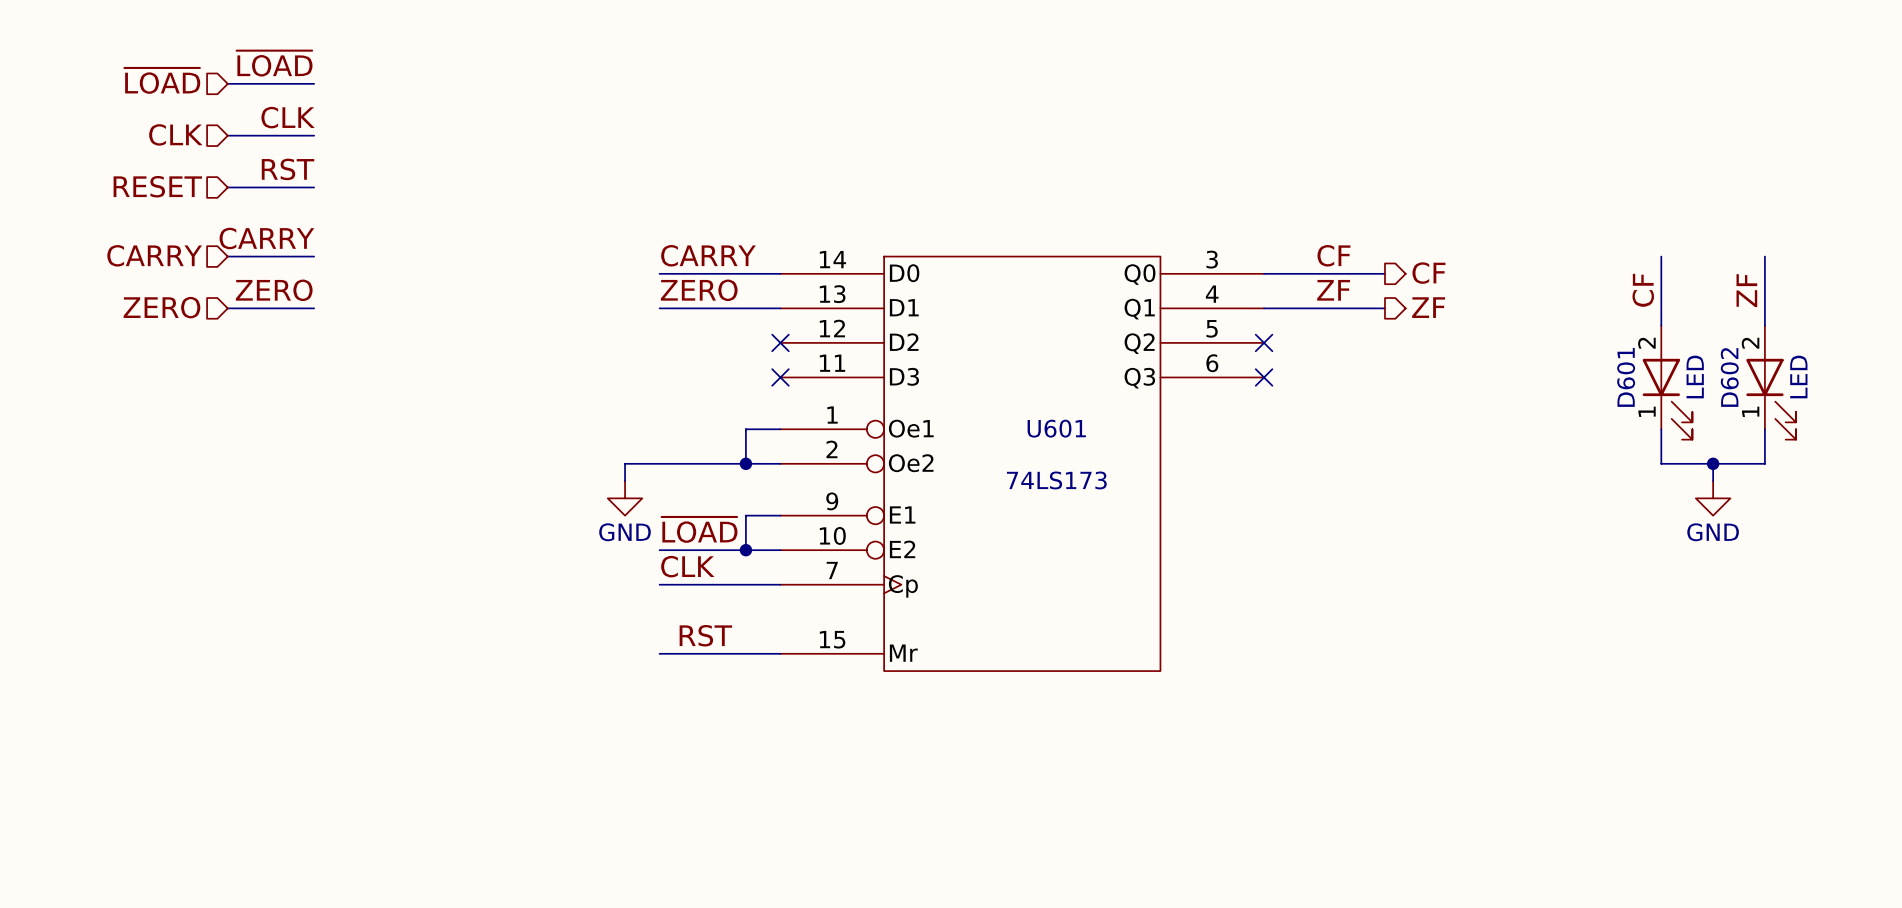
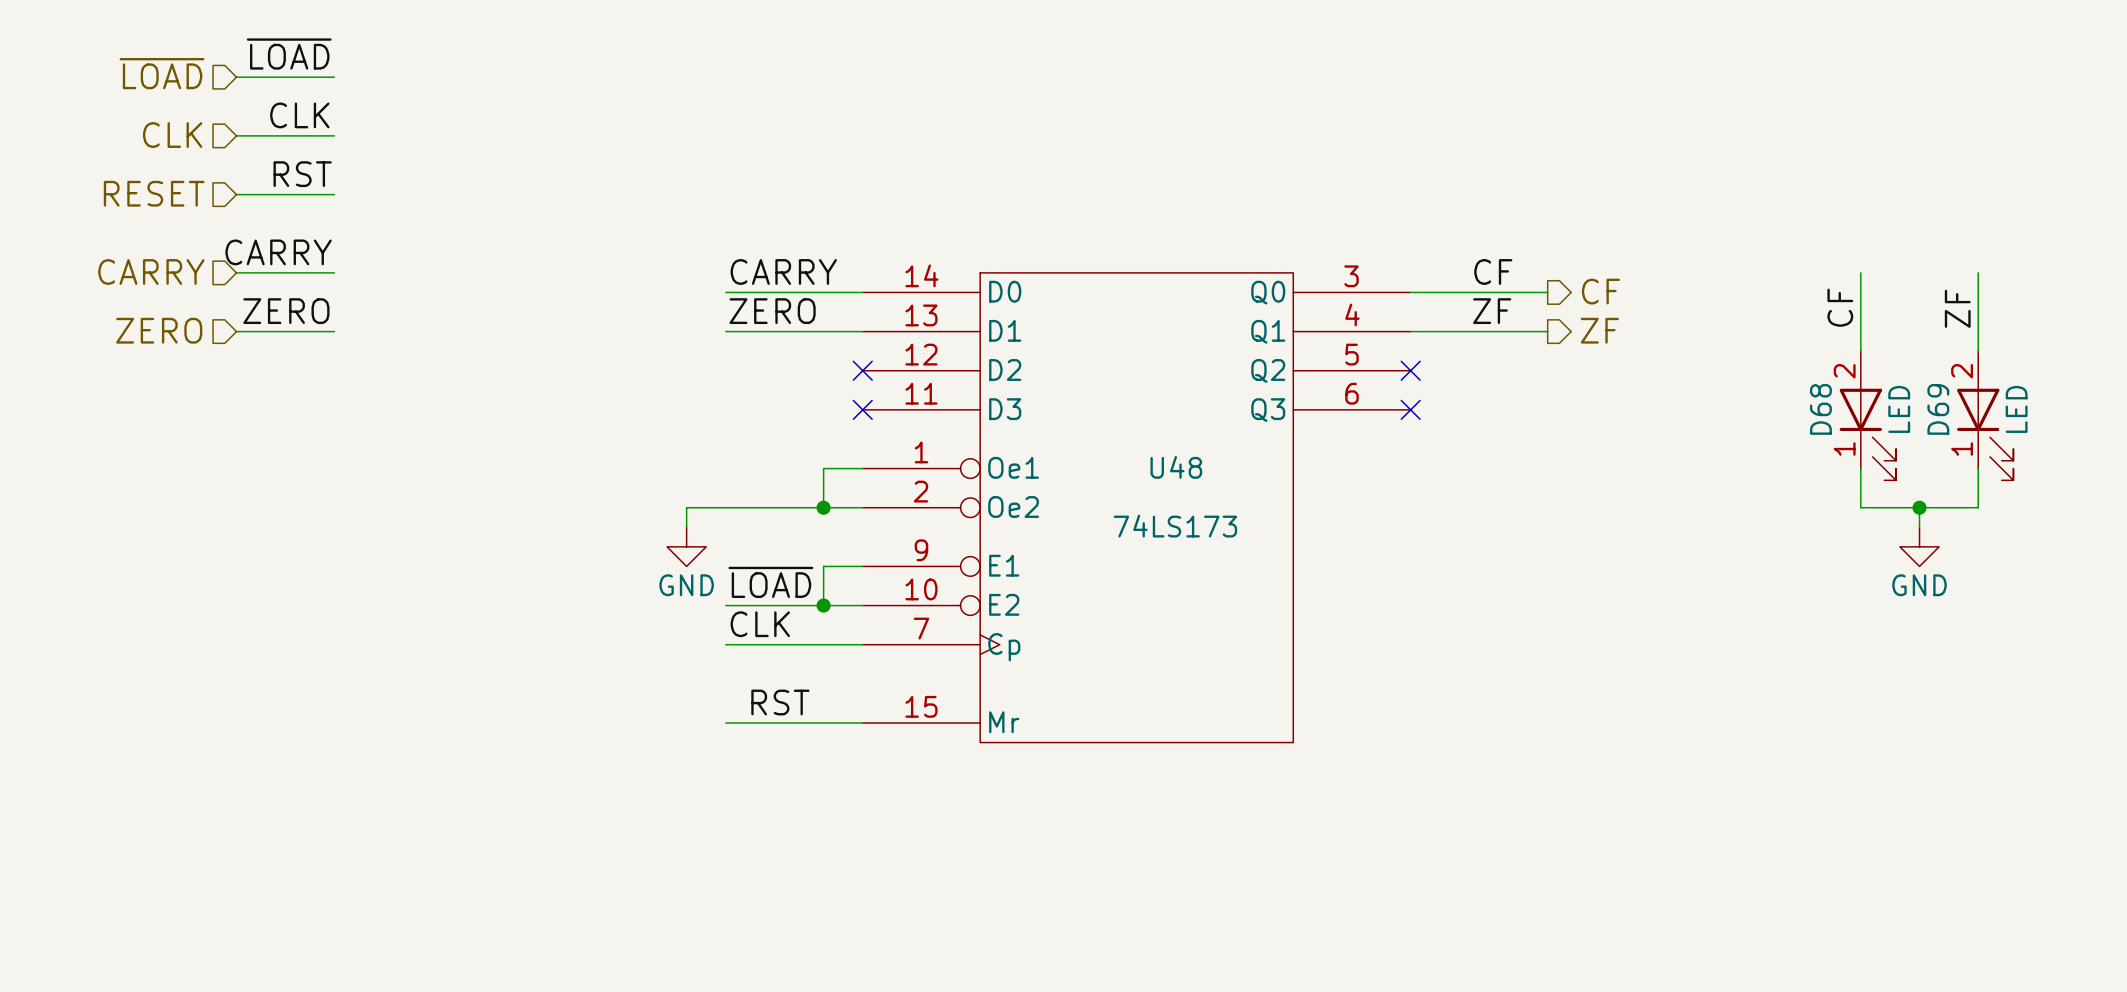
D601 name: D601 (1626, 377) -> D68 (1820, 409)
D602 name: D602 (1729, 377) -> D69 (1938, 409)
U601 name: U601 (1056, 428) -> U48 (1176, 467)

